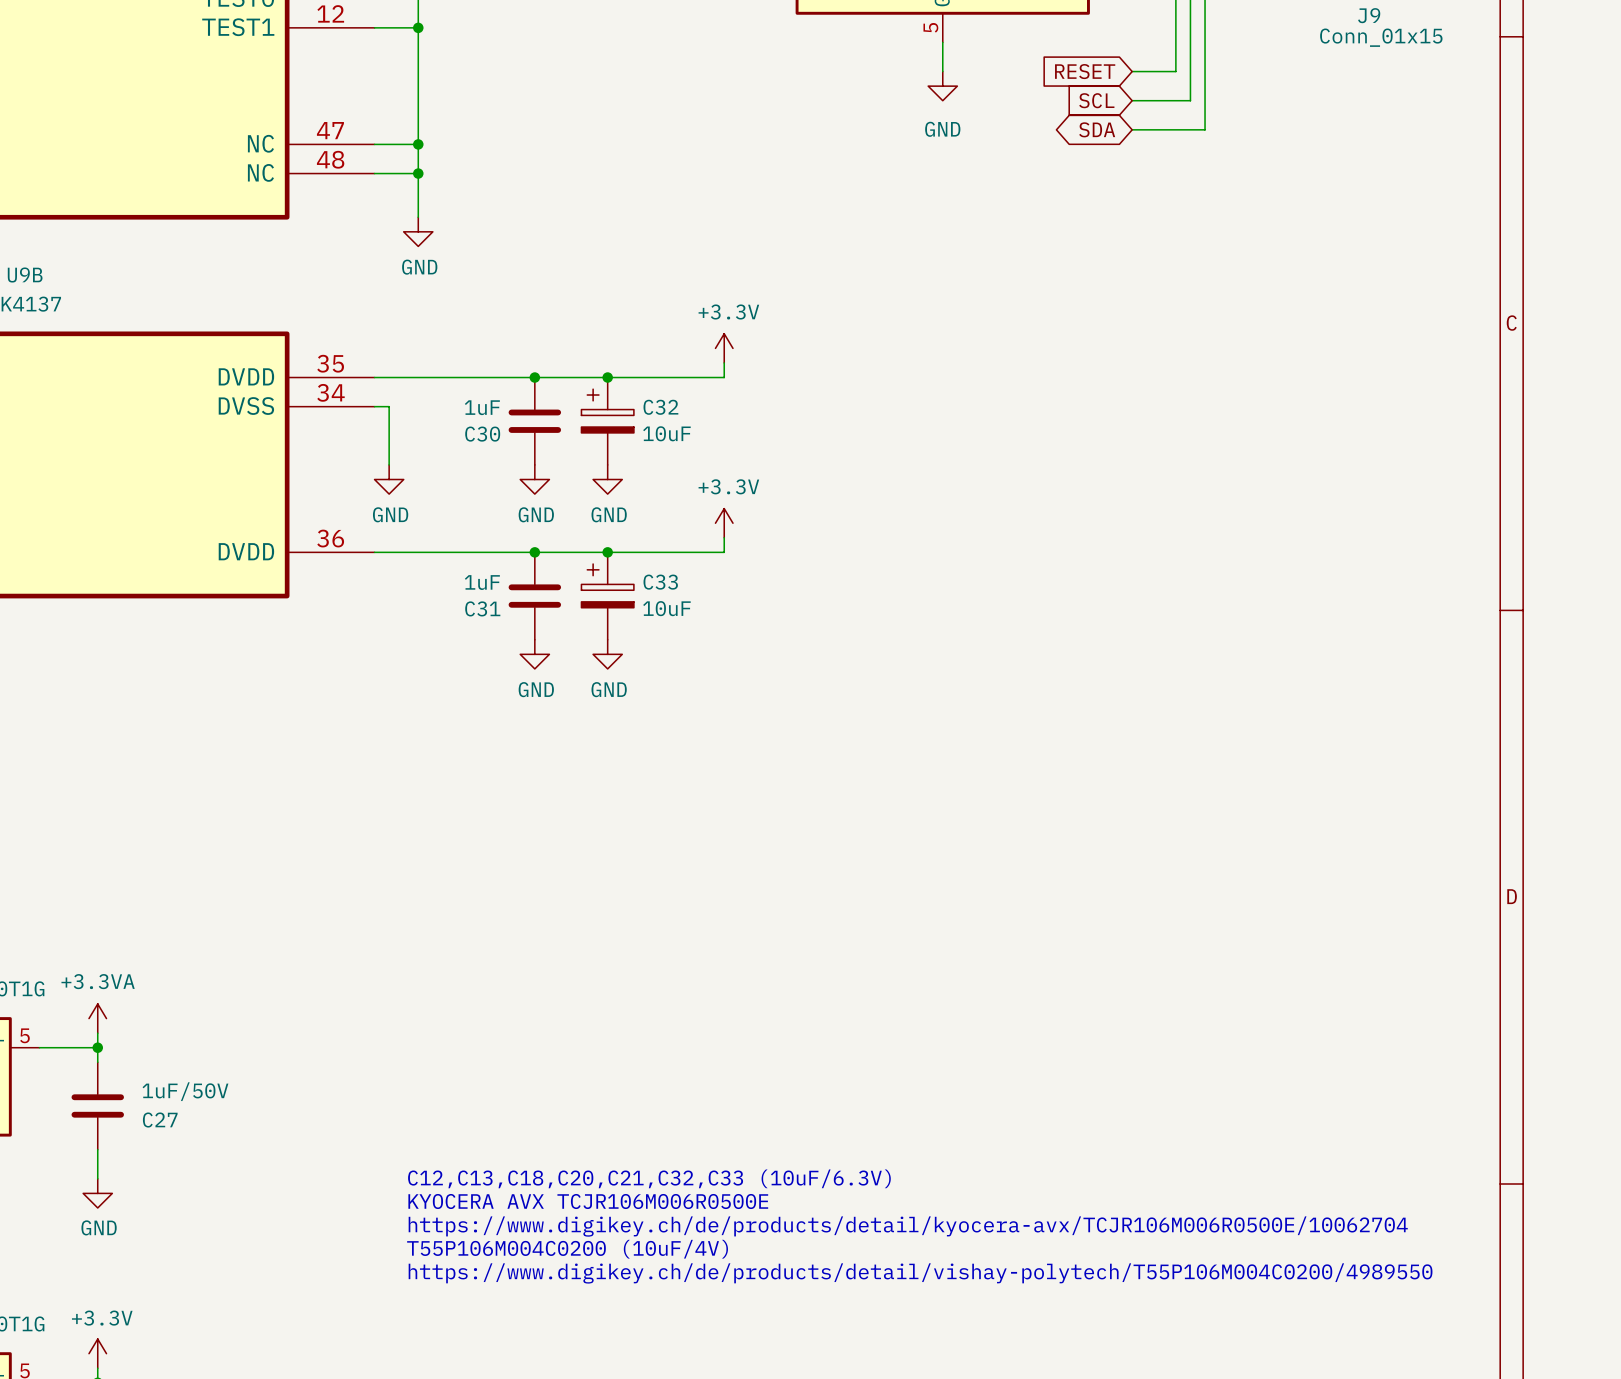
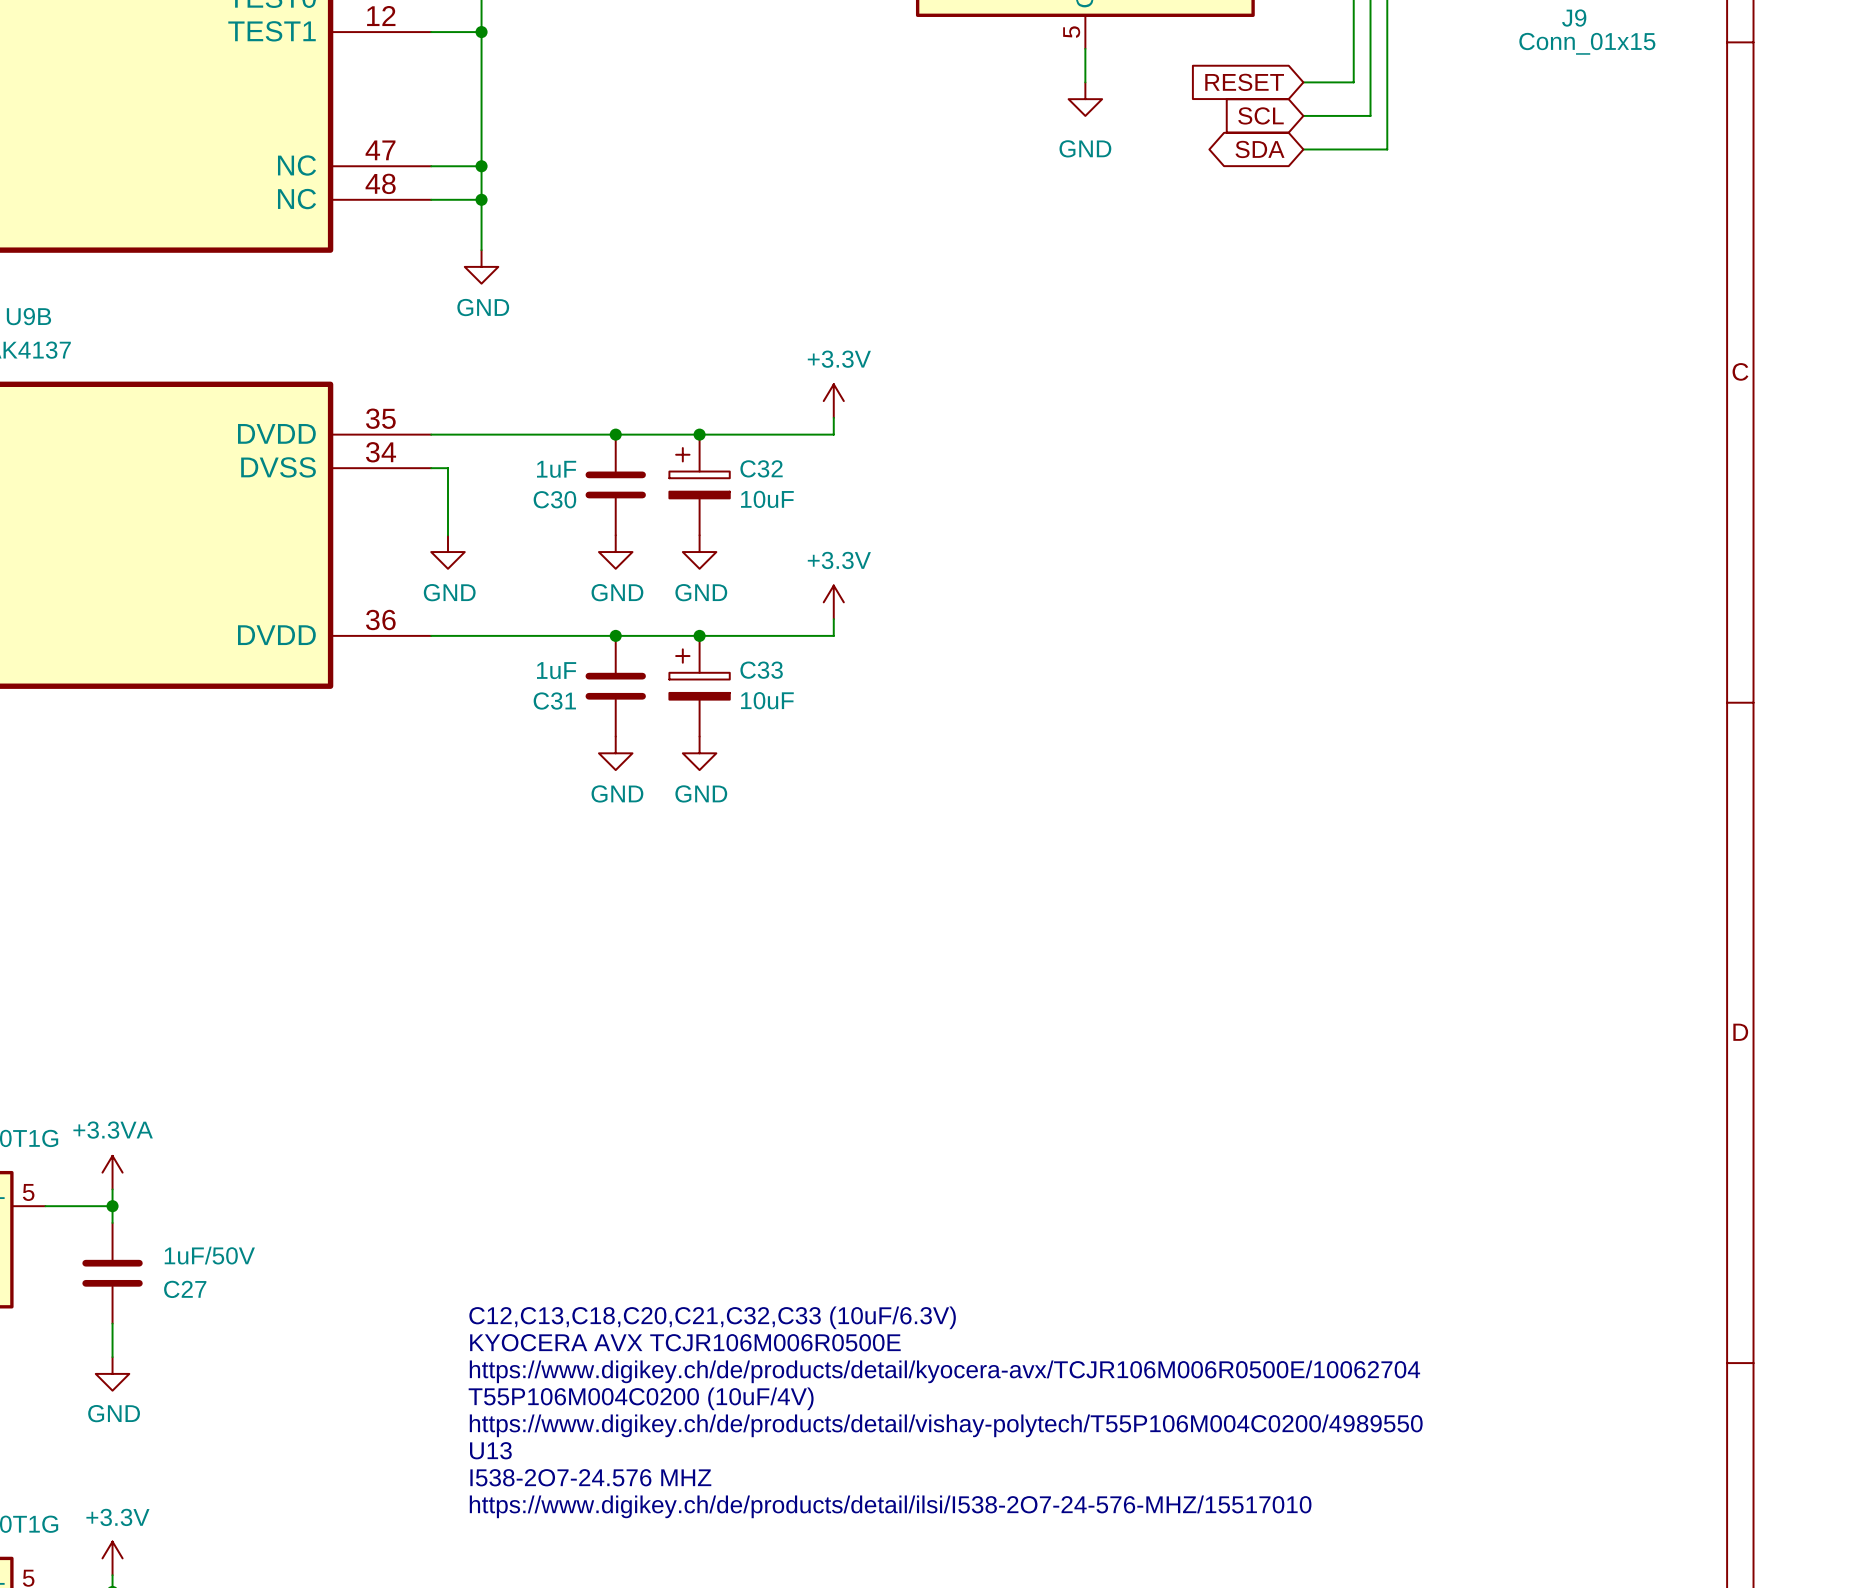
text position: C12,C13,C18,C20,C21,C32,C33 (10uF/6.3V) (649, 1178) -> C12,C13,C18,C20,C21,C32,C33 (10uF/6.3V) (712, 1317)
text position: KYOCERA AVX TCJR106M006R0500E (588, 1201) -> KYOCERA AVX TCJR106M006R0500E (685, 1342)
text position: https://www.digikey.ch/de/products/detail/kyocera-avx/TCJR106M006R0500E/10062704 (908, 1226) -> https://www.digikey.ch/de/products/detail/kyocera-avx/TCJR106M006R0500E/10062704 (944, 1371)
text position: T55P106M004C0200 (10uF/4V) (567, 1249) -> T55P106M004C0200 (10uF/4V) (641, 1398)
text: none -> U13 (490, 1450)
text position: https://www.digikey.ch/de/products/detail/vishay-polytech/T55P106M004C0200/4989550 (920, 1273) -> https://www.digikey.ch/de/products/detail/vishay-polytech/T55P106M004C0200/4989550 (946, 1425)
text: none -> I538-2O7-24.576 MHZ (590, 1477)
text: none -> https://www.digikey.ch/de/products/detail/ilsi/I538-2O7-24-576-MHZ/15517010 (890, 1506)

